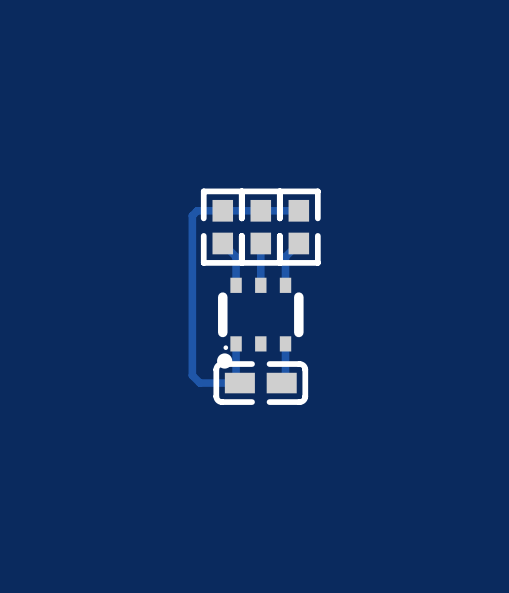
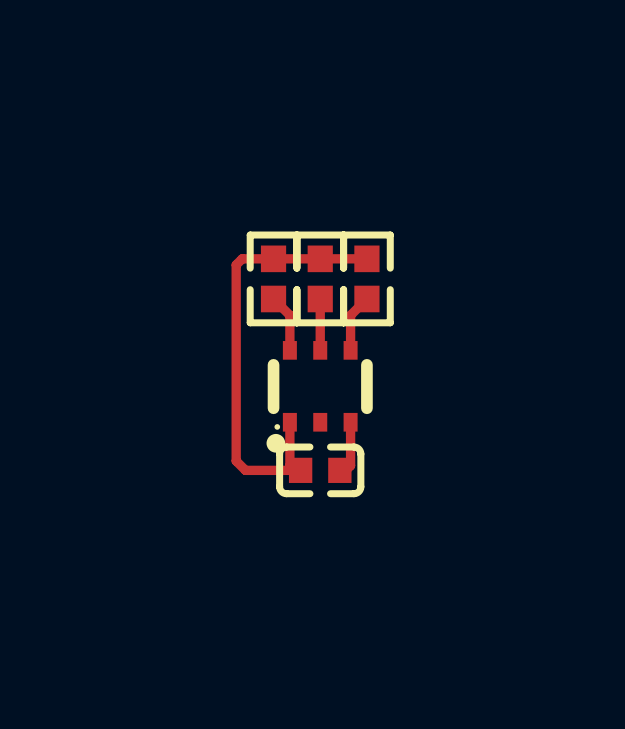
part footprint: [213, 361, 309, 405] -> [276, 443, 365, 498]

